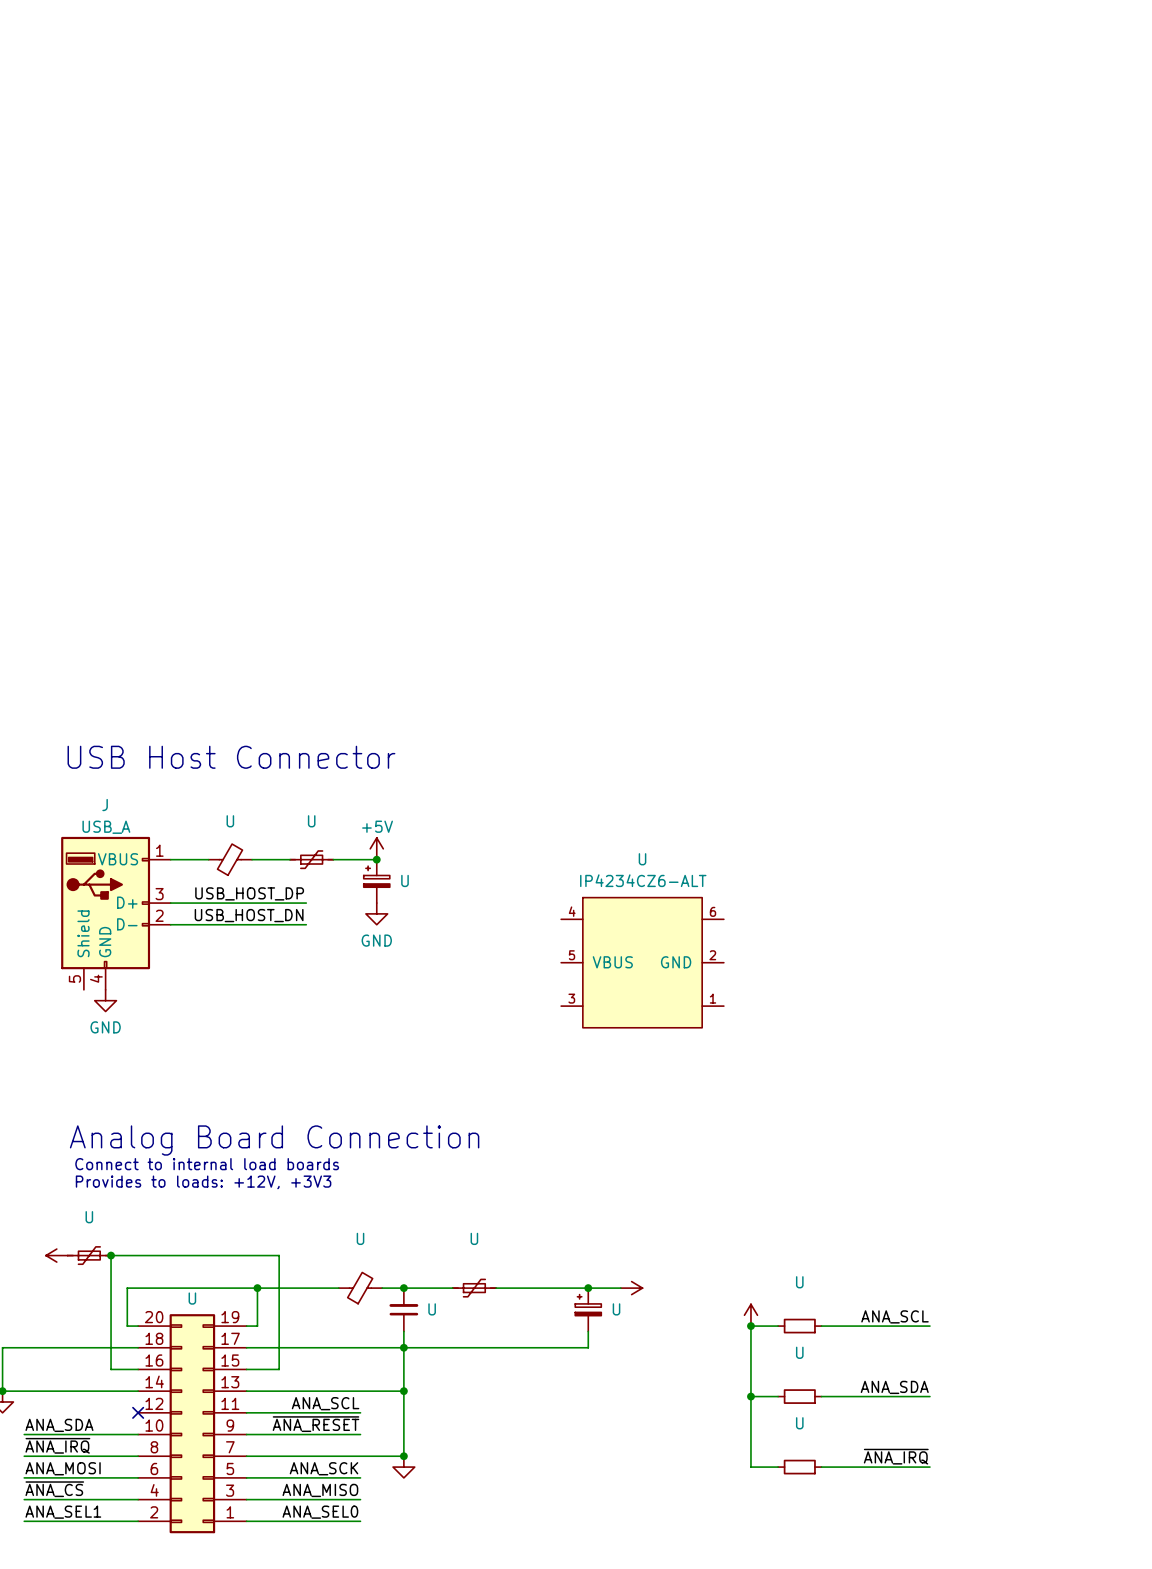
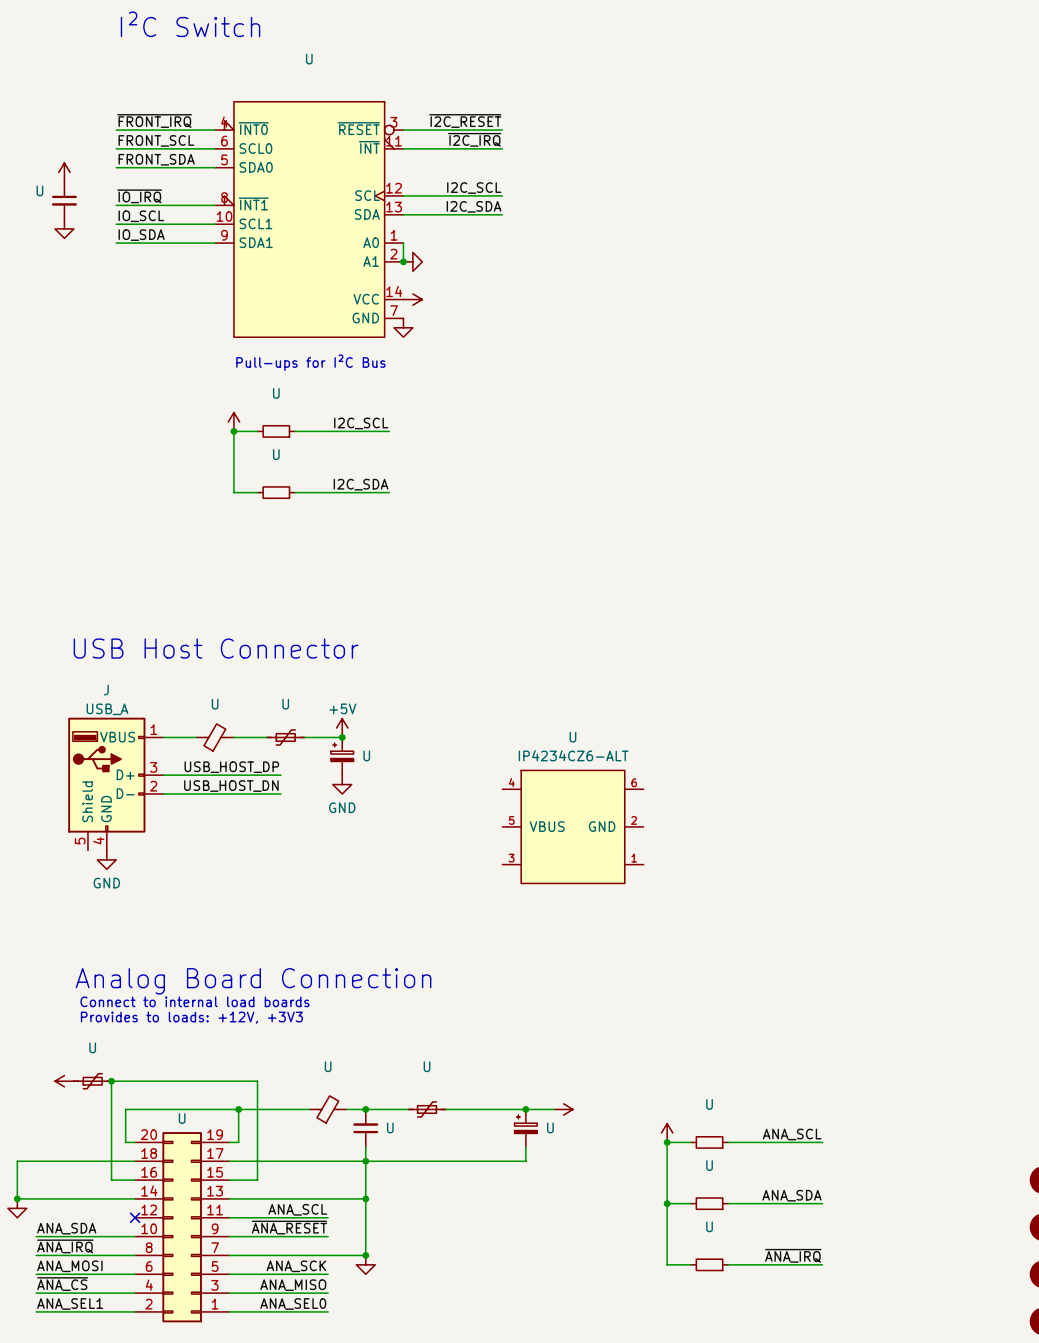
text: none -> I²C Switch (190, 24)
label: none -> ~{FRONT_IRQ} (154, 121)
label: none -> ~{I2C_RESET} (465, 121)
wire: none -> (116, 130) (215, 130)
wire: none -> (403, 130) (502, 130)
label: none -> ~{I2C_IRQ} (474, 139)
label: none -> FRONT_SCL (156, 140)
wire: none -> (116, 148) (215, 148)
wire: none -> (403, 148) (502, 148)
label: none -> FRONT_SDA (156, 159)
wire: none -> (116, 167) (215, 167)
power symbol: none -> (64, 172)
label: none -> I2C_SCL (474, 188)
wire: none -> (403, 195) (502, 195)
label: none -> ~{IO_IRQ} (139, 196)
U: none -> (64, 200)
wire: none -> (116, 205) (215, 205)
label: none -> I2C_SDA (474, 206)
wire: none -> (403, 214) (502, 214)
label: none -> IO_SCL (141, 216)
U: none -> (309, 219)
wire: none -> (116, 224) (215, 224)
power symbol: none -> (64, 228)
label: none -> IO_SDA (141, 235)
wire: none -> (116, 243) (215, 243)
wire: none -> (403, 243) (403, 261)
junction: none -> (403, 261)
power symbol: none -> (412, 261)
power symbol: none -> (412, 299)
power symbol: none -> (403, 327)
text: none -> Pull-ups for I²C Bus (310, 362)
power symbol: none -> (233, 421)
label: none -> I2C_SCL (361, 423)
junction: none -> (233, 431)
wire: none -> (257, 431) (233, 431) (233, 492) (257, 492)
U: none -> (276, 431)
wire: none -> (295, 431) (389, 431)
label: none -> I2C_SDA (361, 484)
U: none -> (276, 492)
wire: none -> (295, 492) (389, 492)

